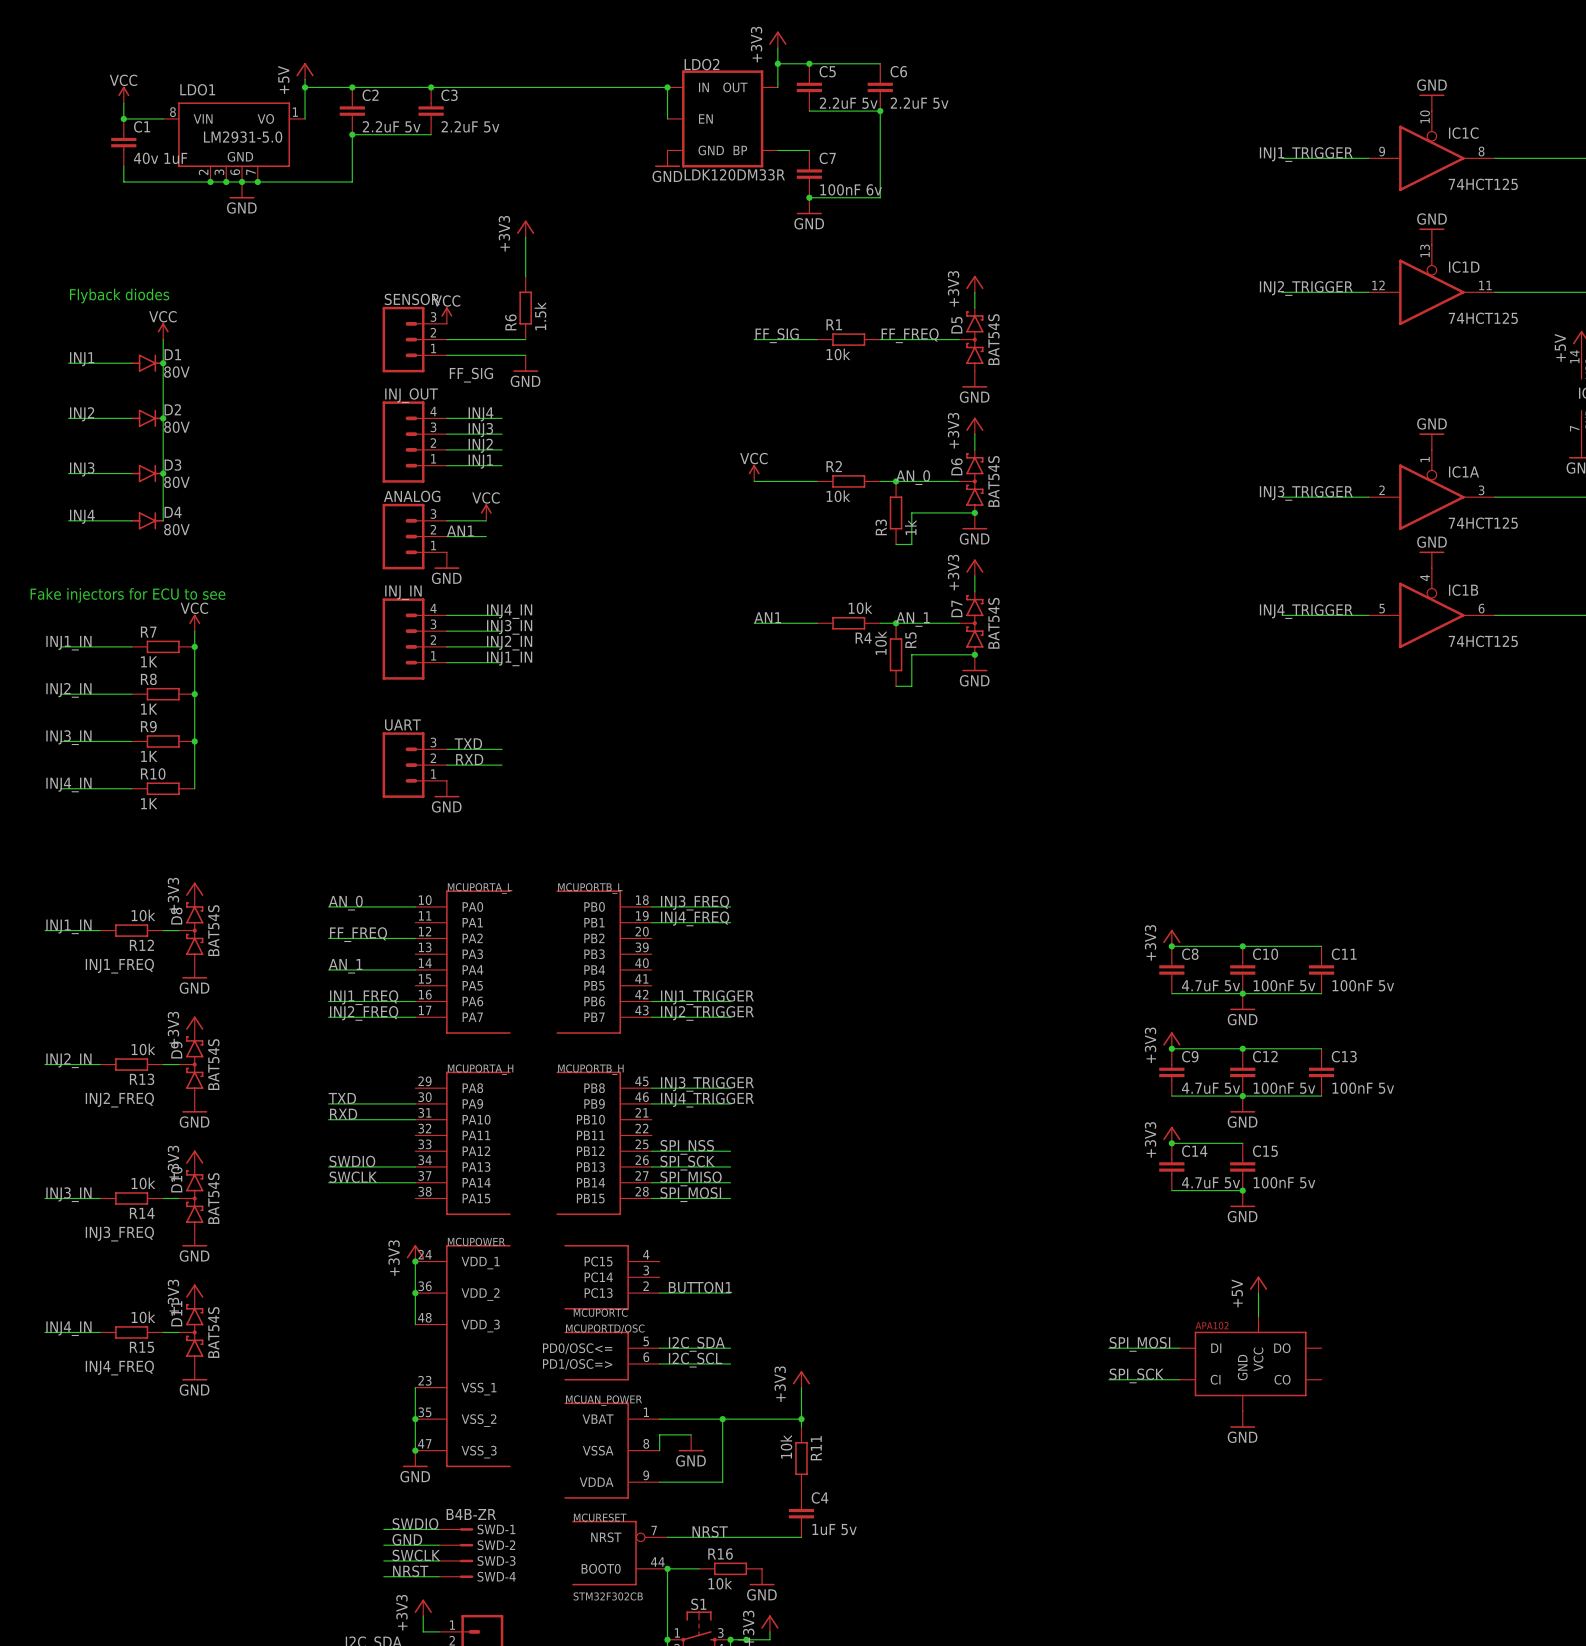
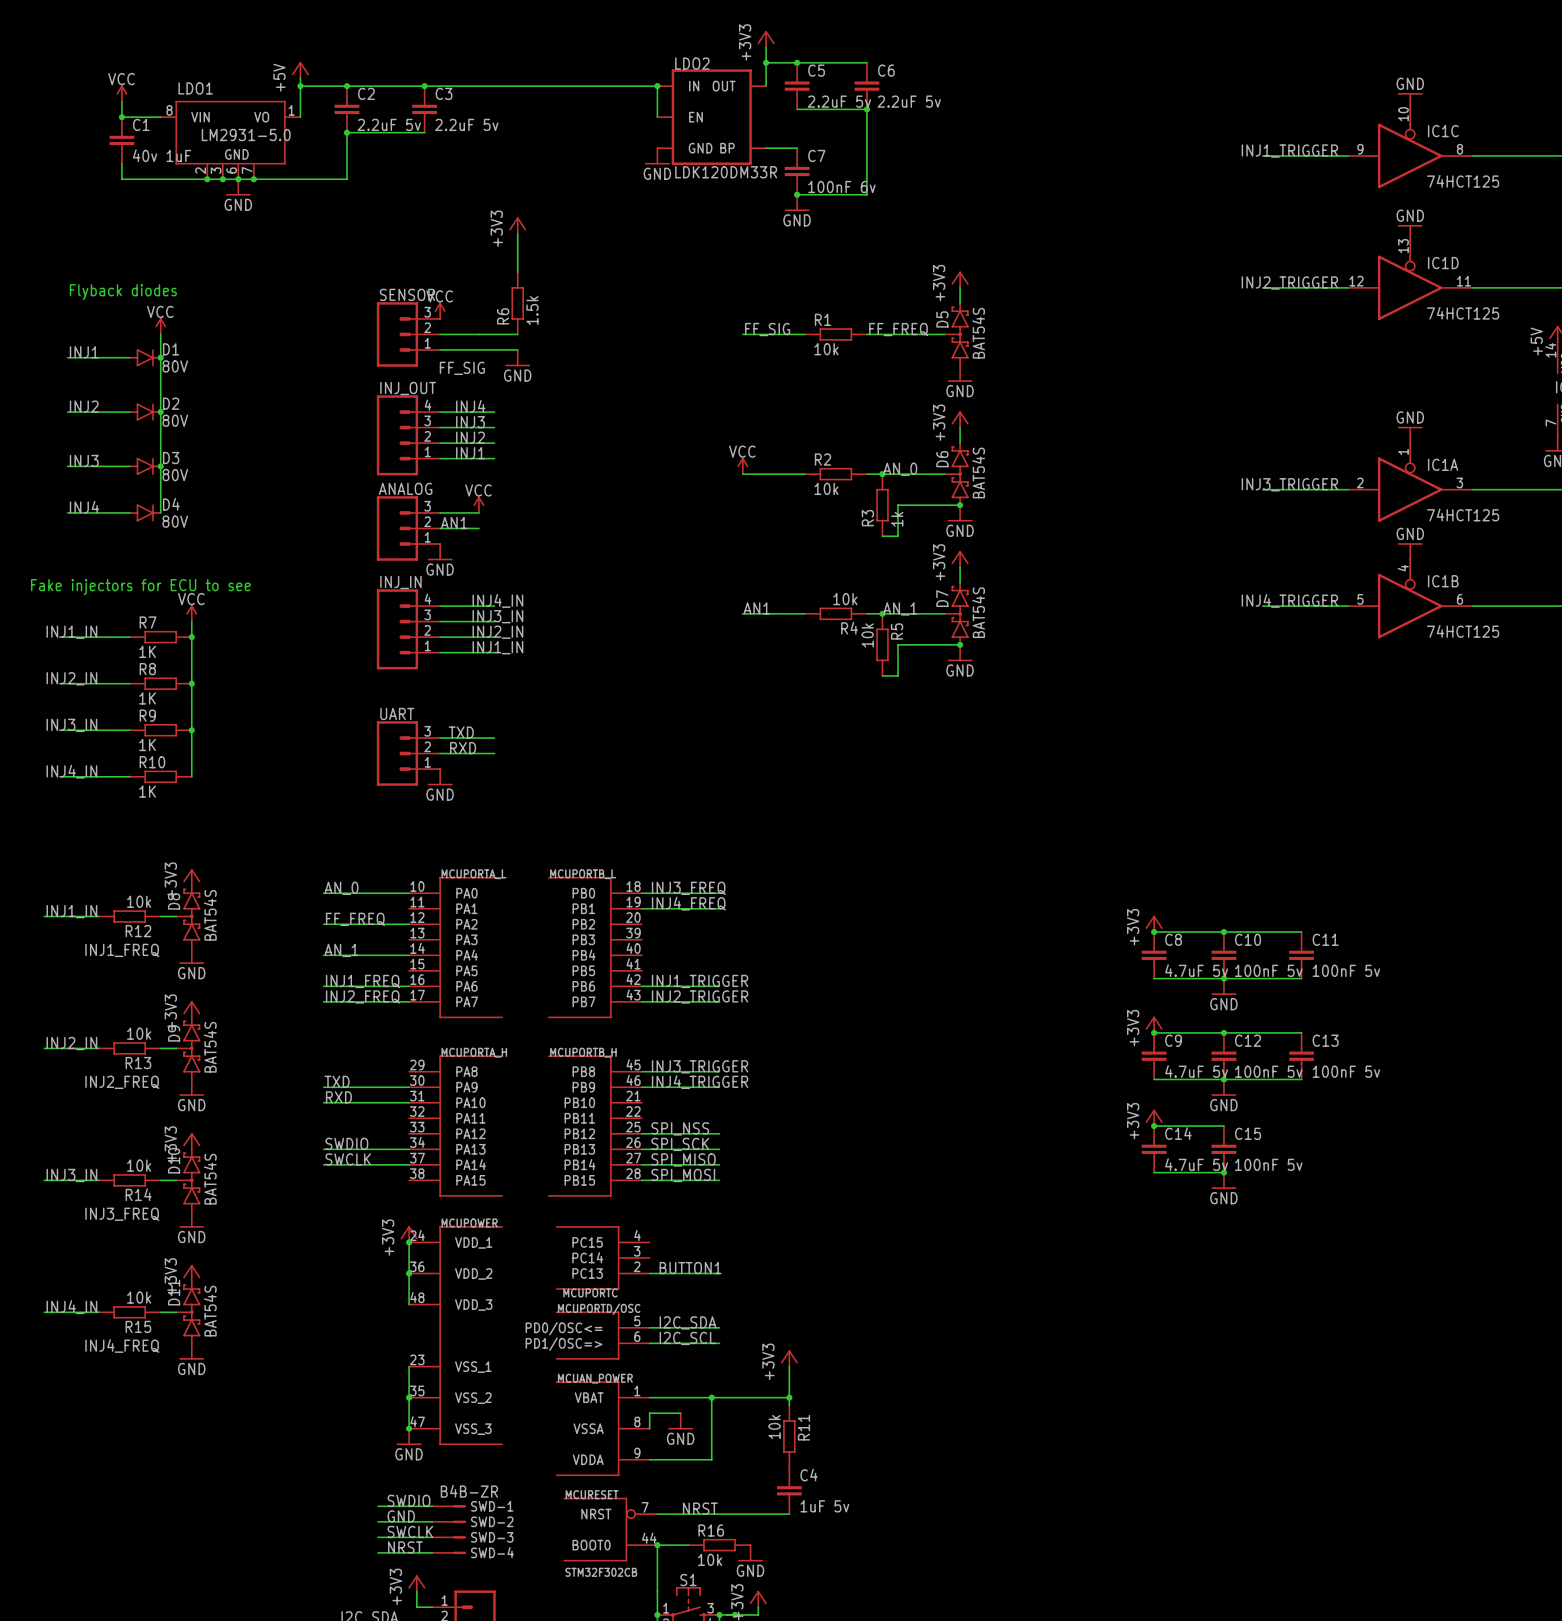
power symbol: +5V (1258, 1284) -> none
wire: (1258, 1293) (1258, 1316) -> none
label: SPI_MOSI (1139, 1344) -> none
wire: (1108, 1348) (1179, 1348) -> none
part: (1250, 1363) -> none
label: SPI_SCK (1136, 1375) -> none
wire: (1108, 1379) (1179, 1379) -> none
power symbol: GND (1242, 1419) -> none

